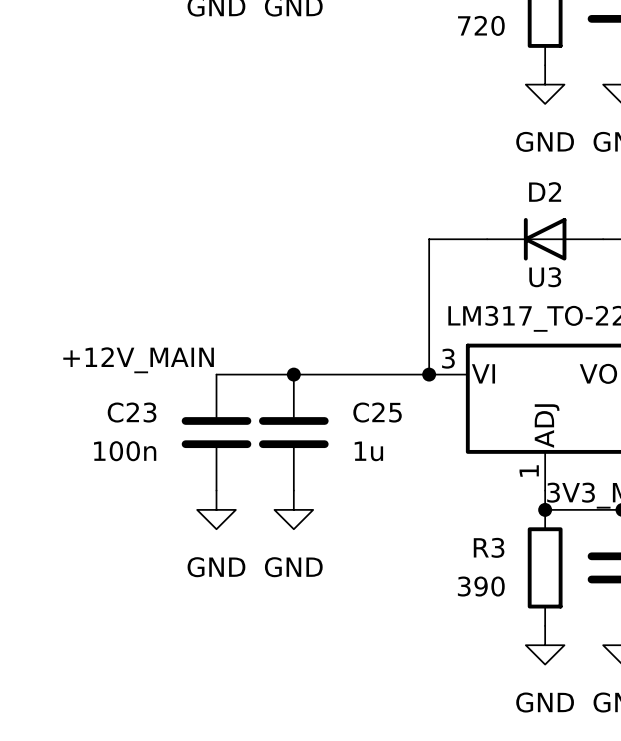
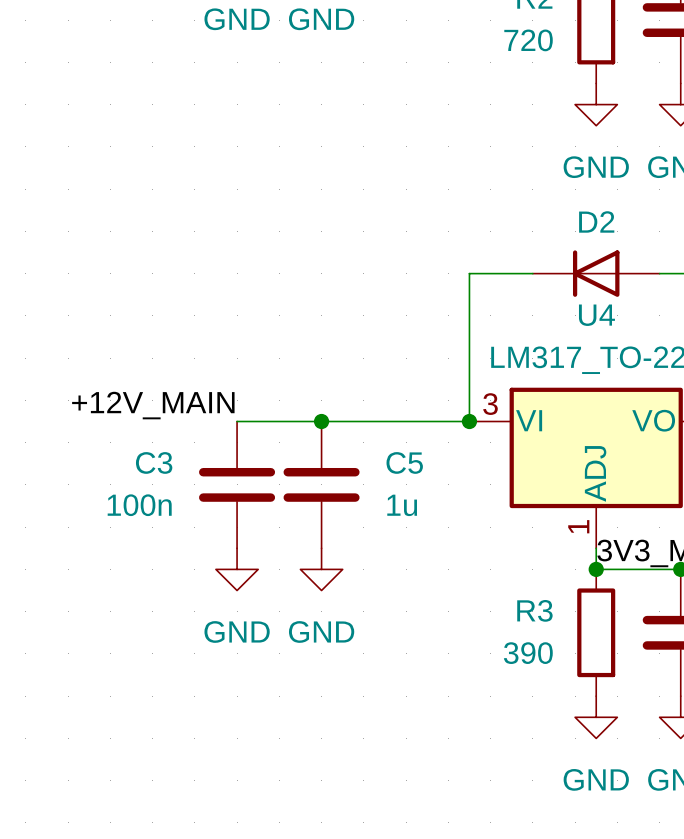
U3 name: U3 (545, 277) -> U4 (596, 315)
C23 name: C23 (132, 412) -> C3 (154, 462)
C25 name: C25 (377, 412) -> C5 (404, 462)

